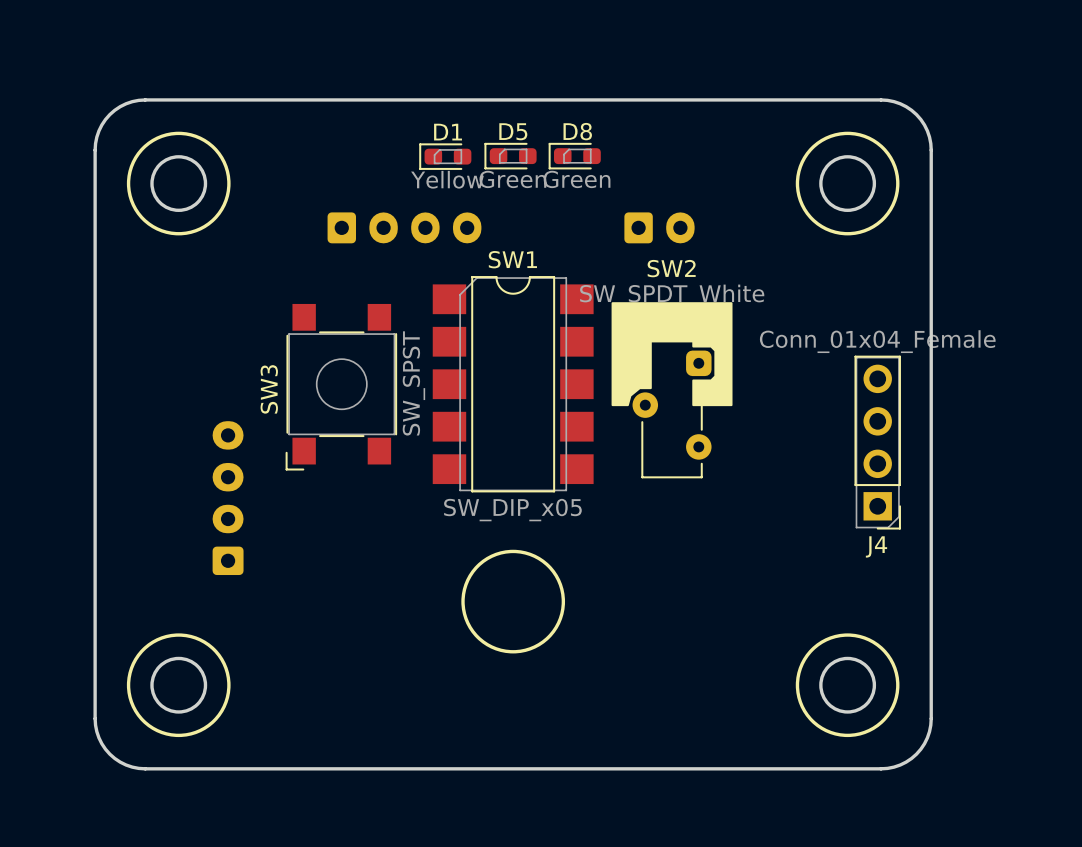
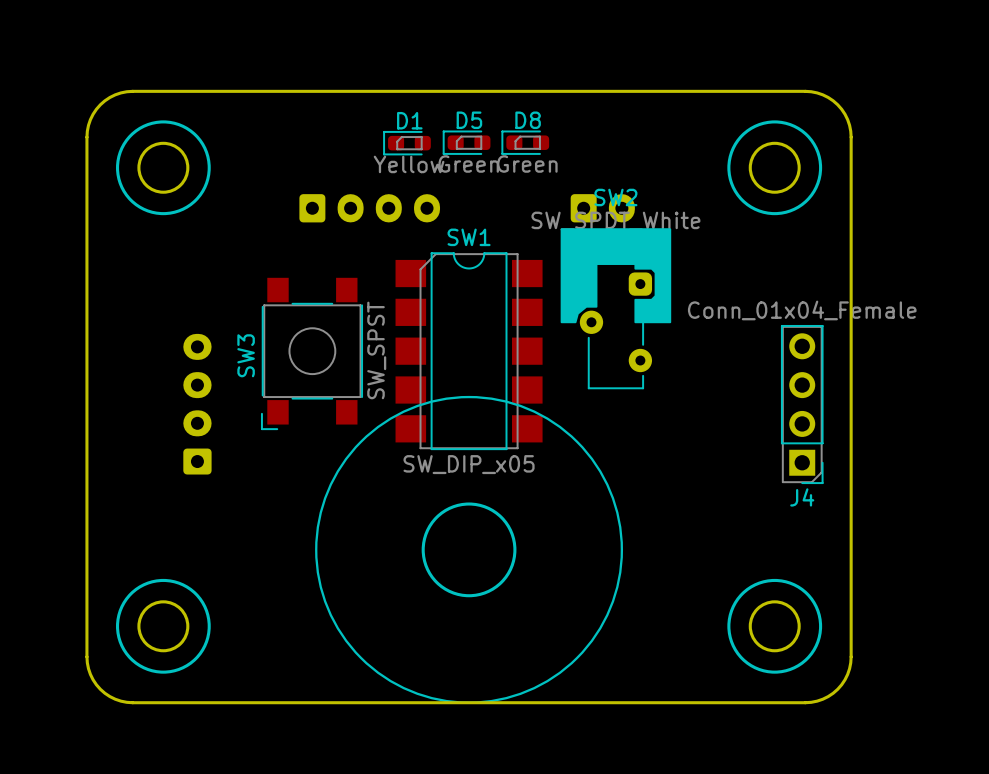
SW2 position: (672, 390) -> (615, 308)
drawing: none -> [315, 395, 624, 704]
part position: (228, 498) -> (197, 404)

